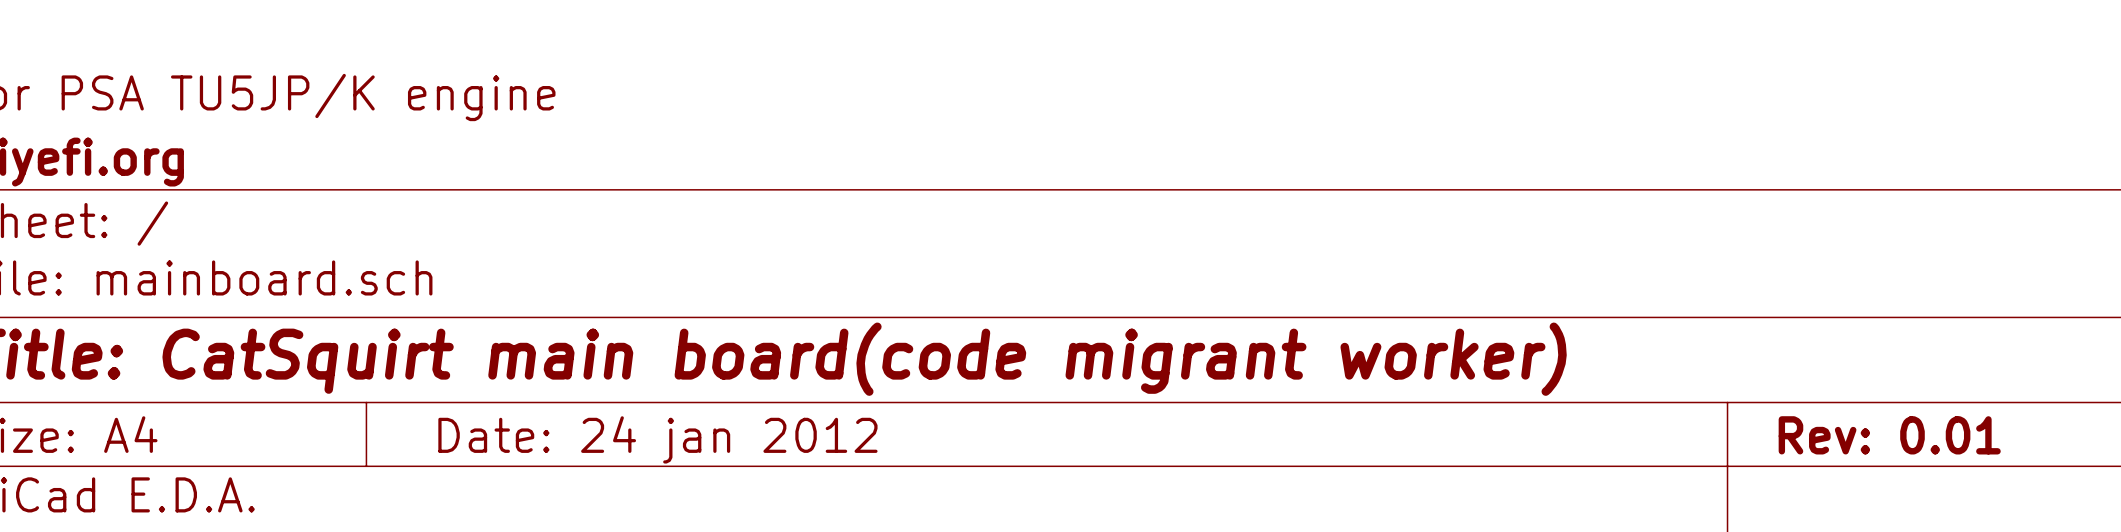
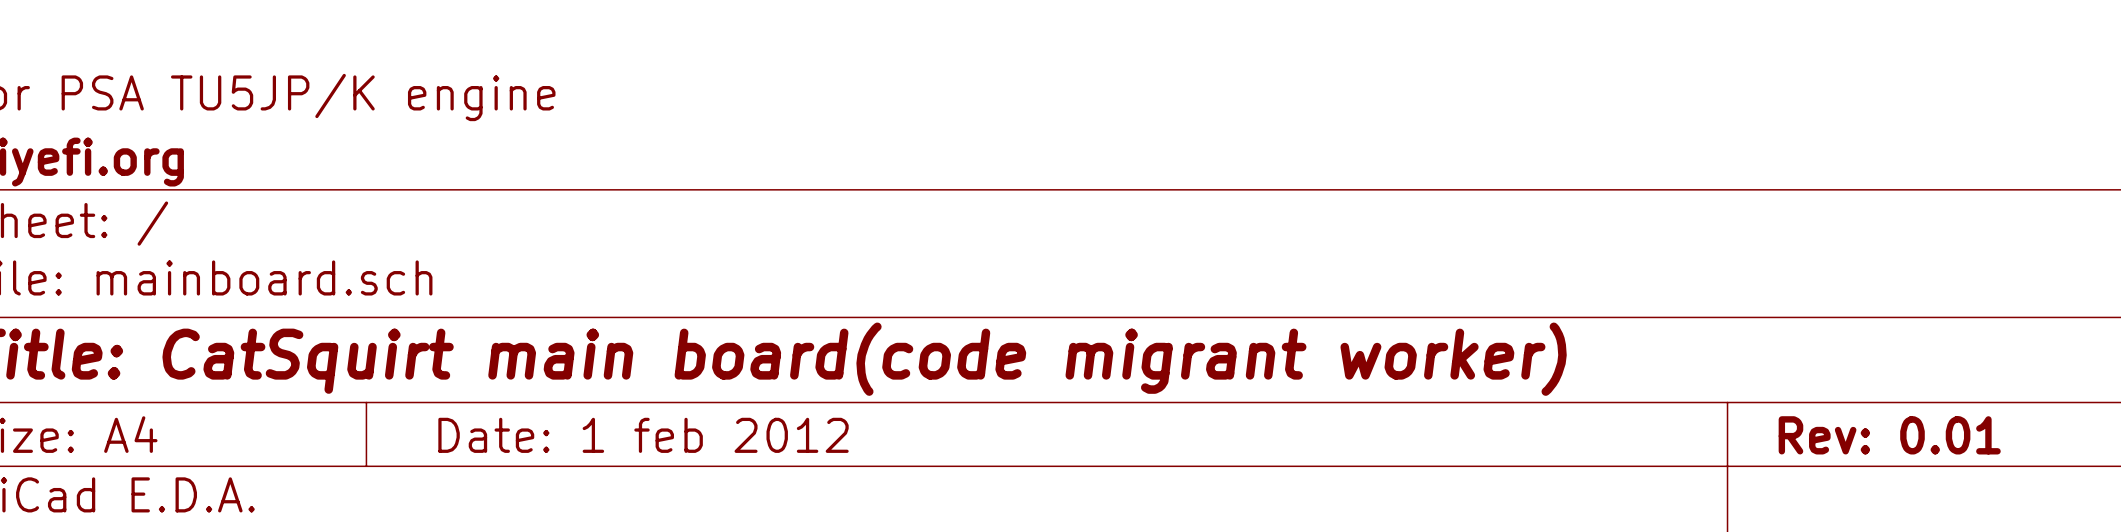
title block: Date: 24 jan 2012 (657, 439) -> Date: 1 feb 2012 (643, 435)

